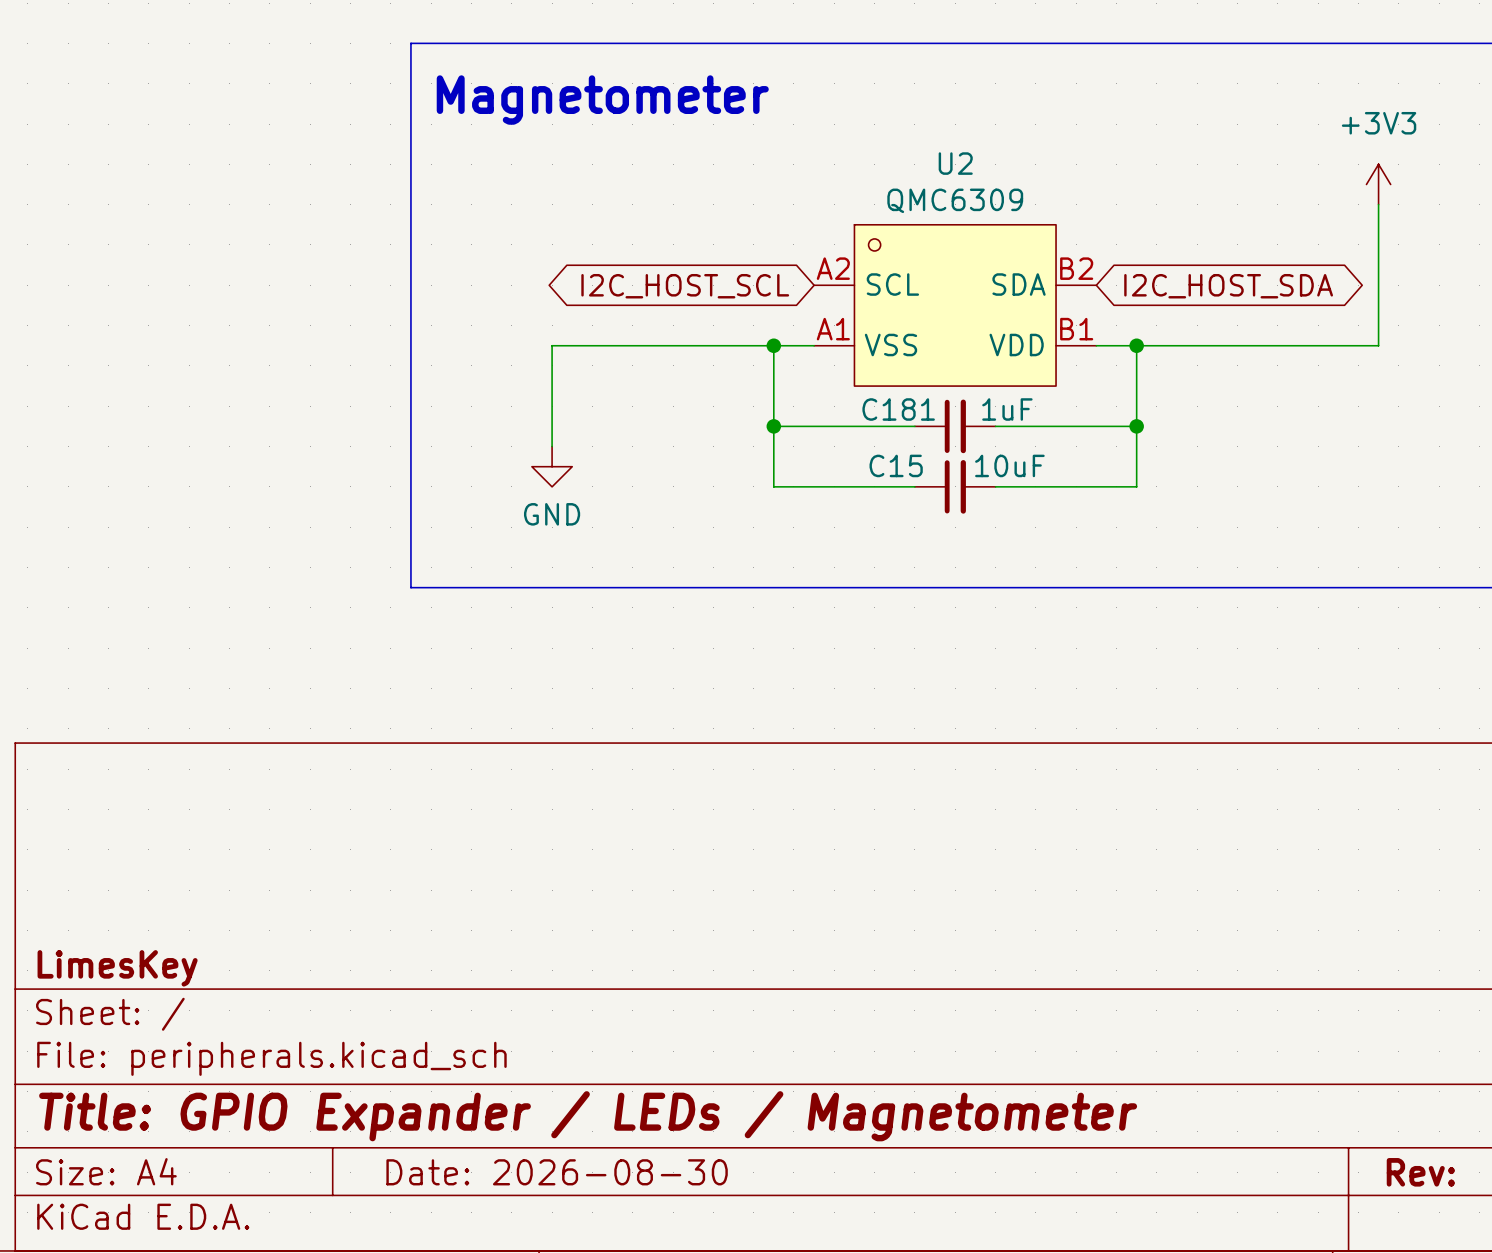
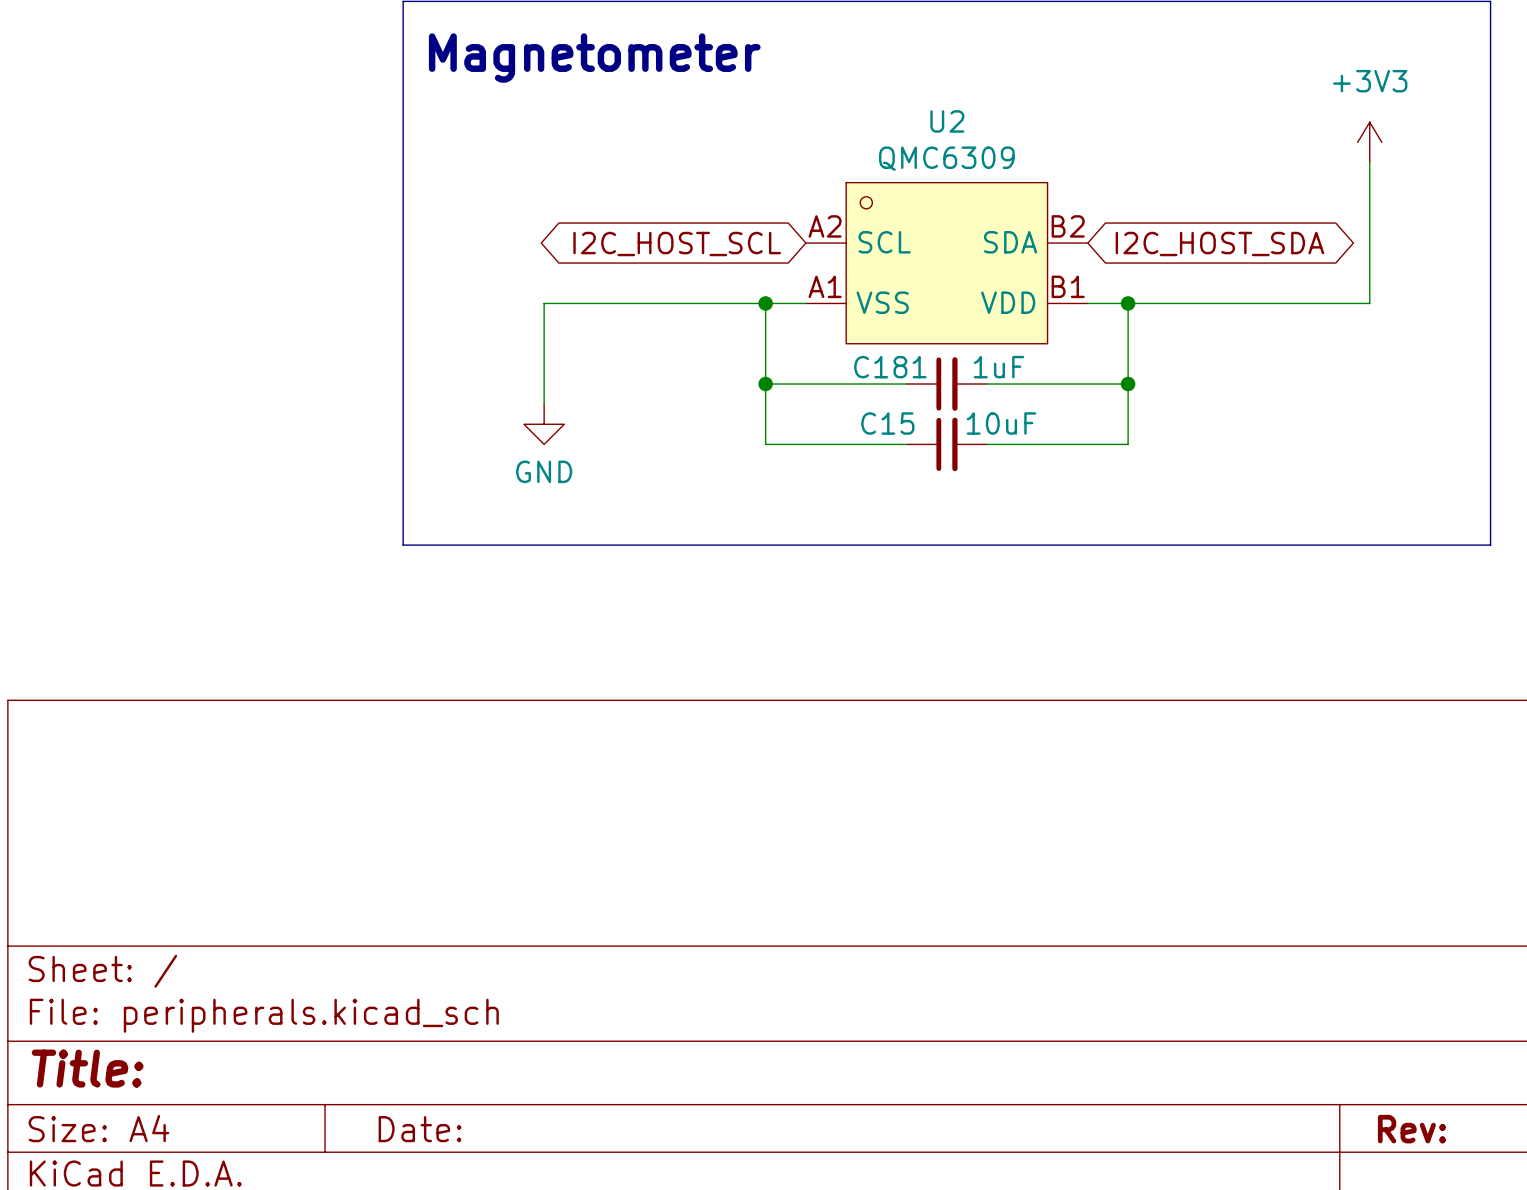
title block: LimesKey (117, 968) -> none
title block: Title: GPIO Expander / LEDs / Magnetometer (588, 1116) -> Title: (87, 1068)
title block: Date: 2026-08-30 (557, 1172) -> Date: (420, 1129)

